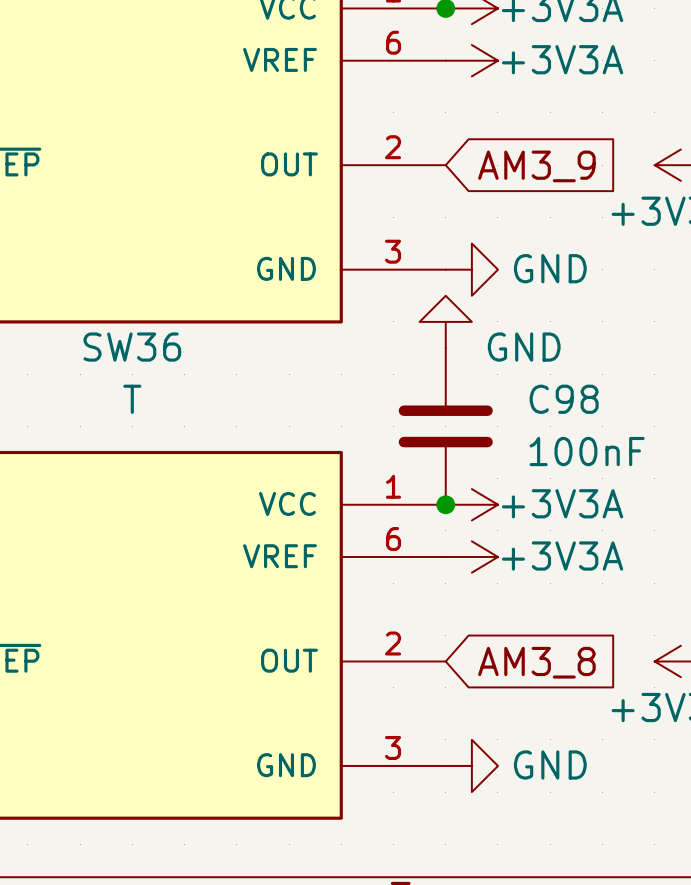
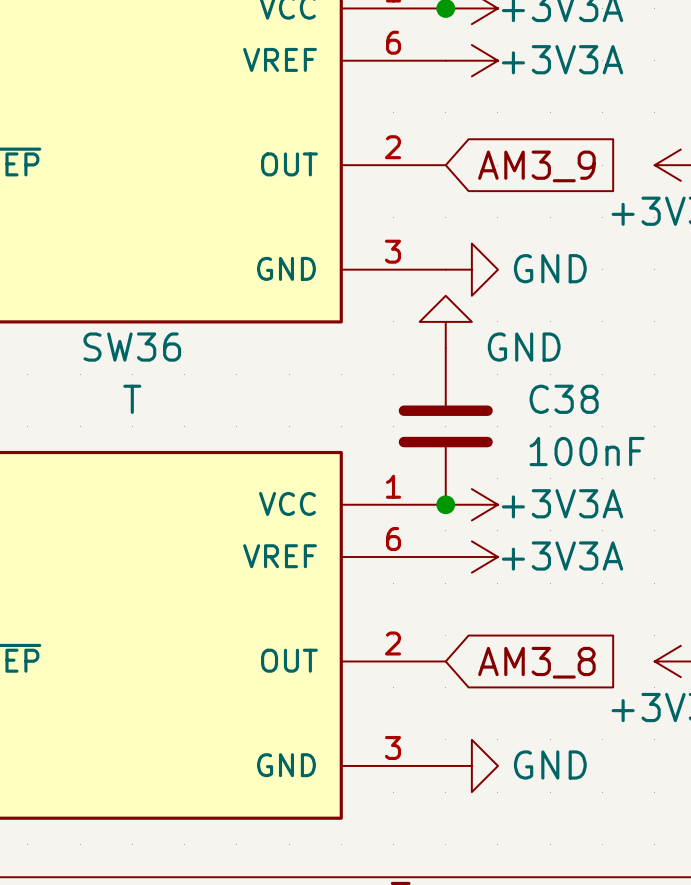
C98 name: C98 (564, 399) -> C38 (564, 399)

